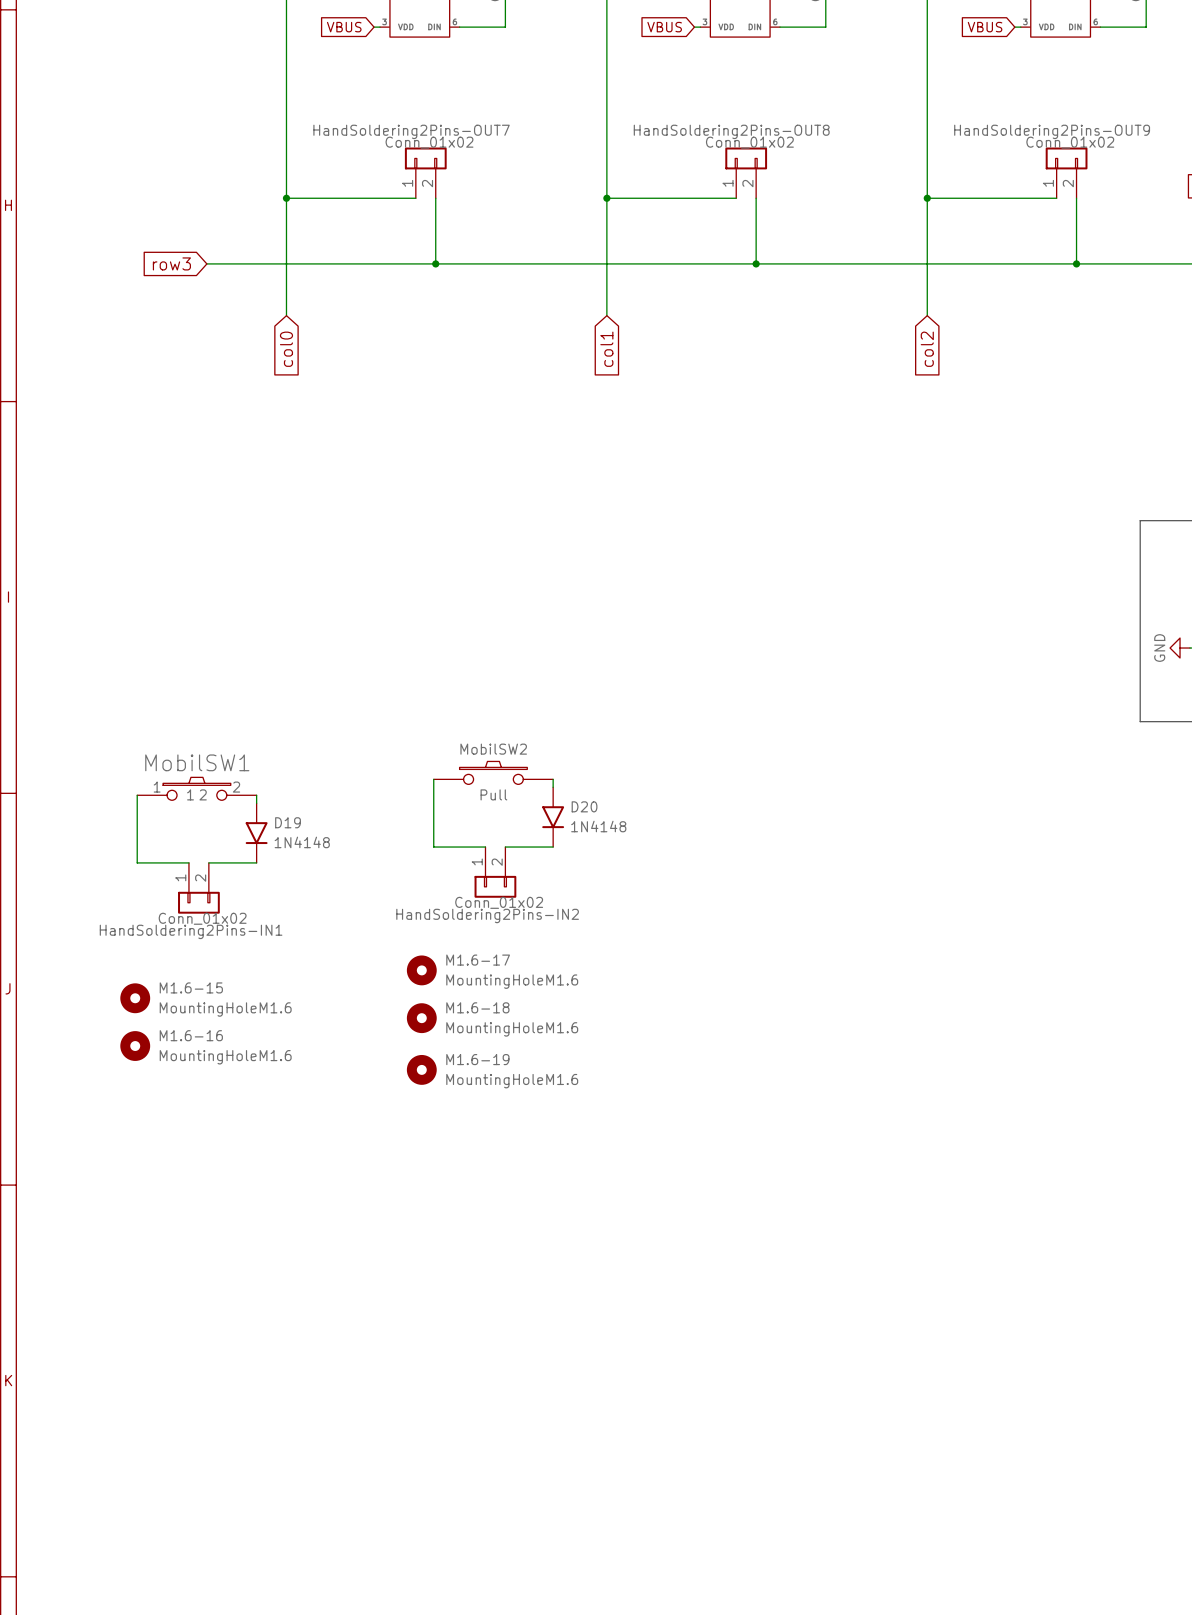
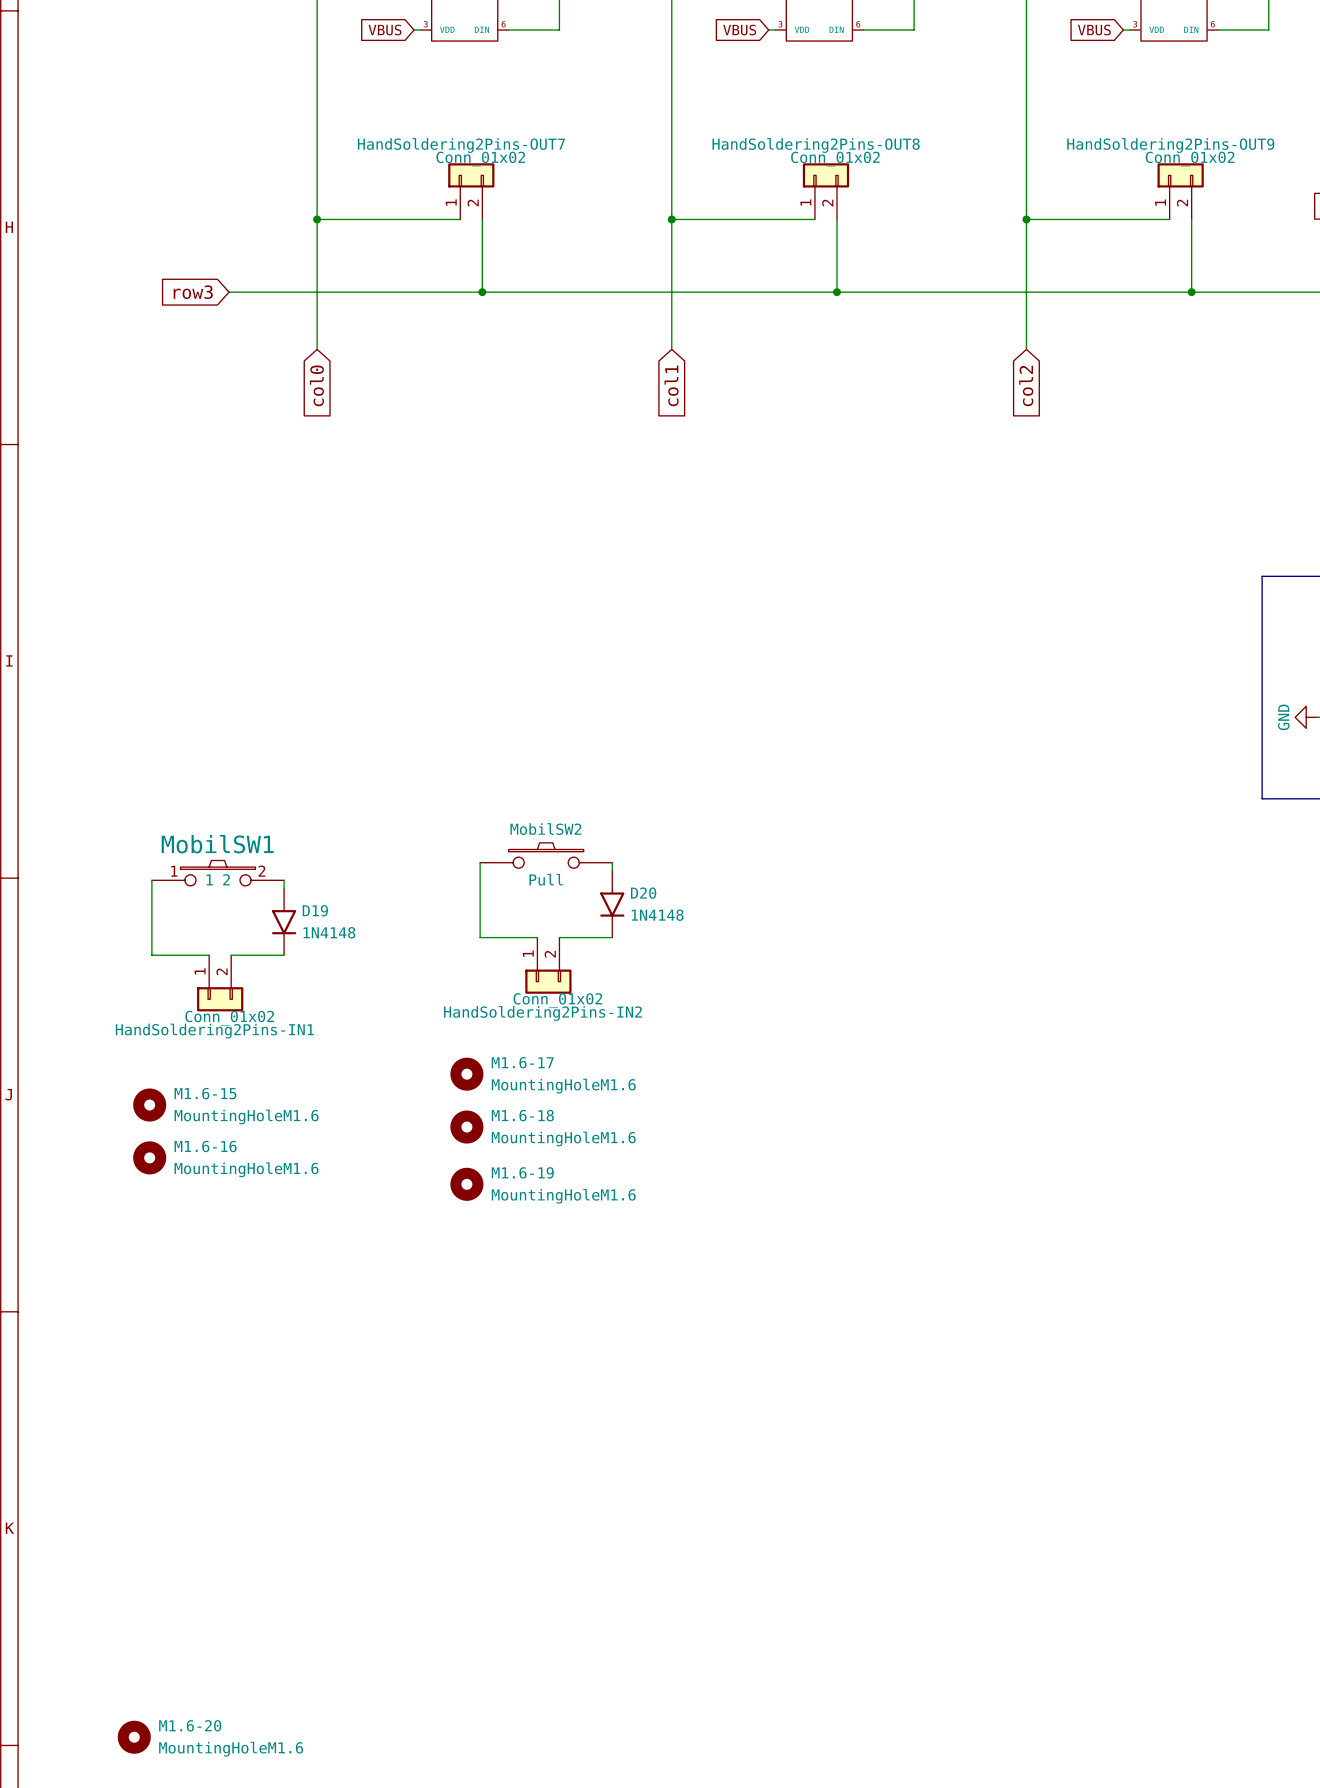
M1.6-20: none -> MountingHoleM1.6 (134, 1737)

